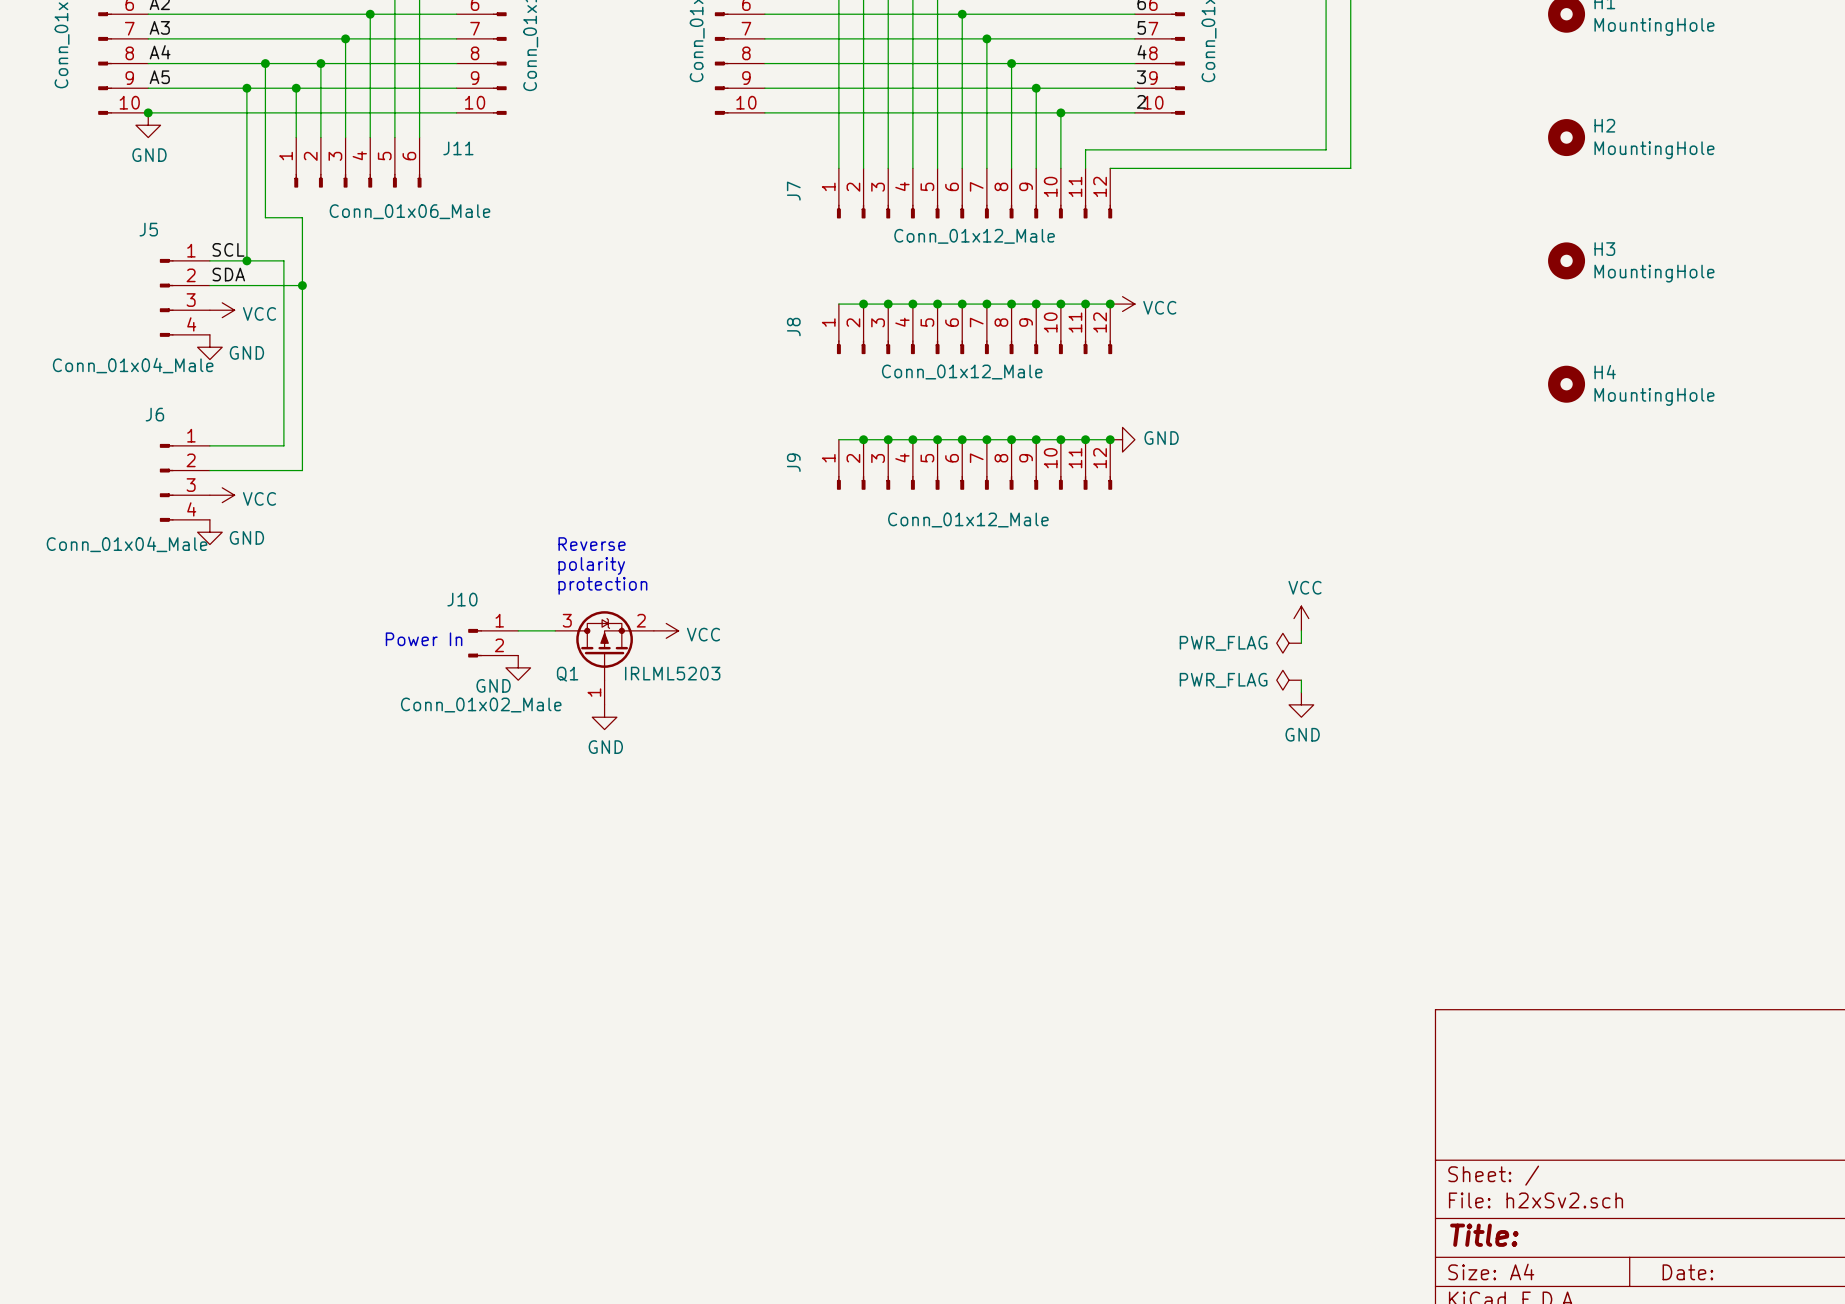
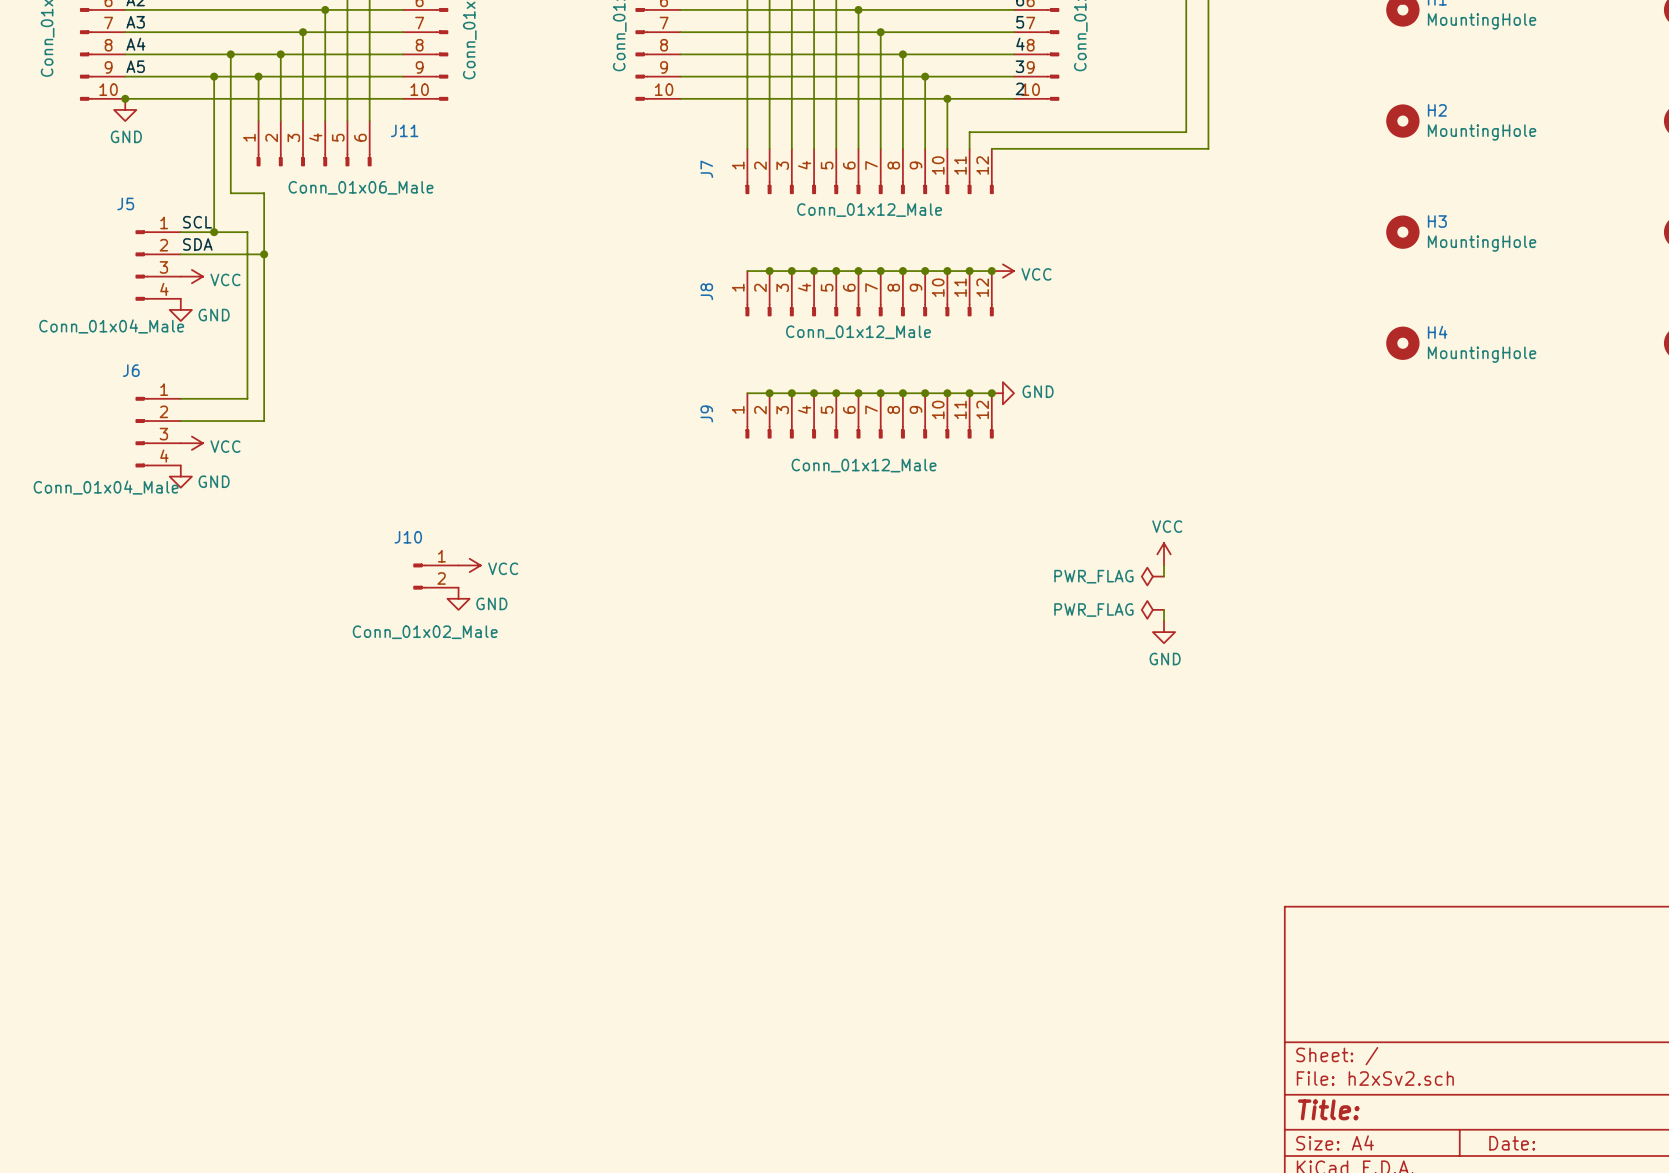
text: Reverse (592, 544) -> none
text: polarity (591, 565) -> none
text: protection (602, 585) -> none
power symbol position: VCC (666, 630) -> VCC (469, 565)
text: Power In (424, 639) -> none
Q1: IRLML5203 (604, 658) -> none
power symbol text position: GND (493, 685) -> GND (491, 603)
power symbol: GND (604, 717) -> none

